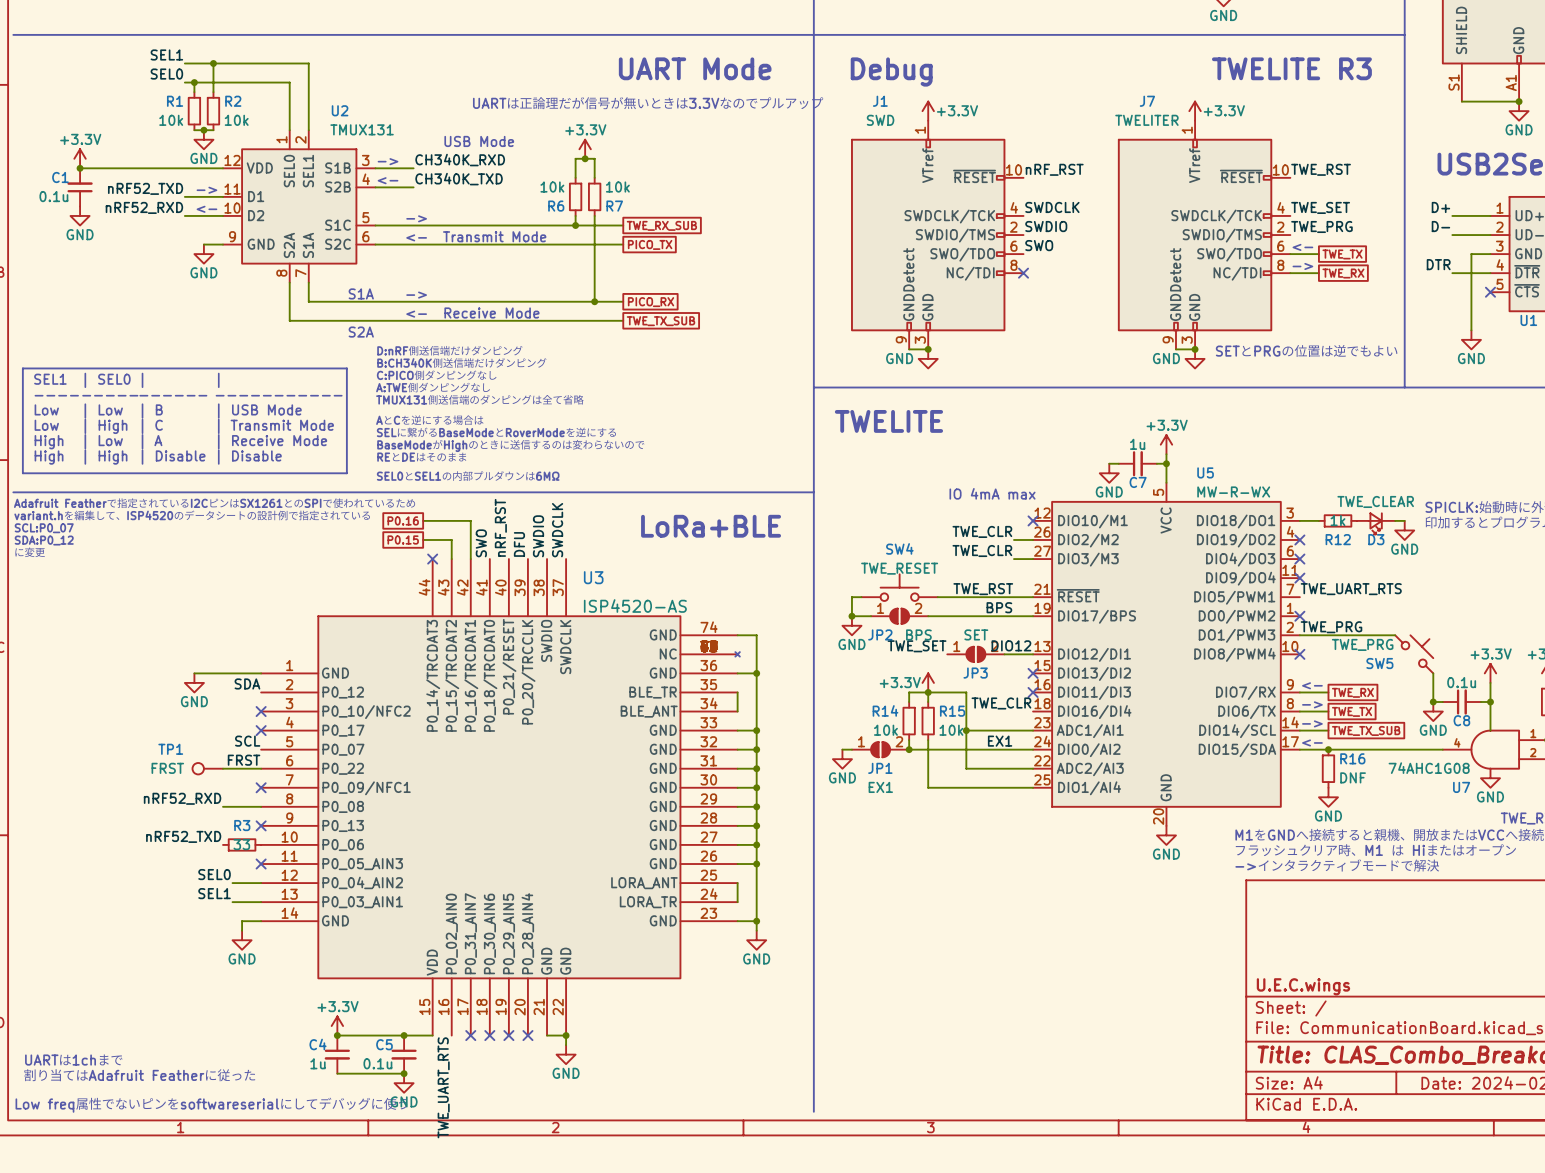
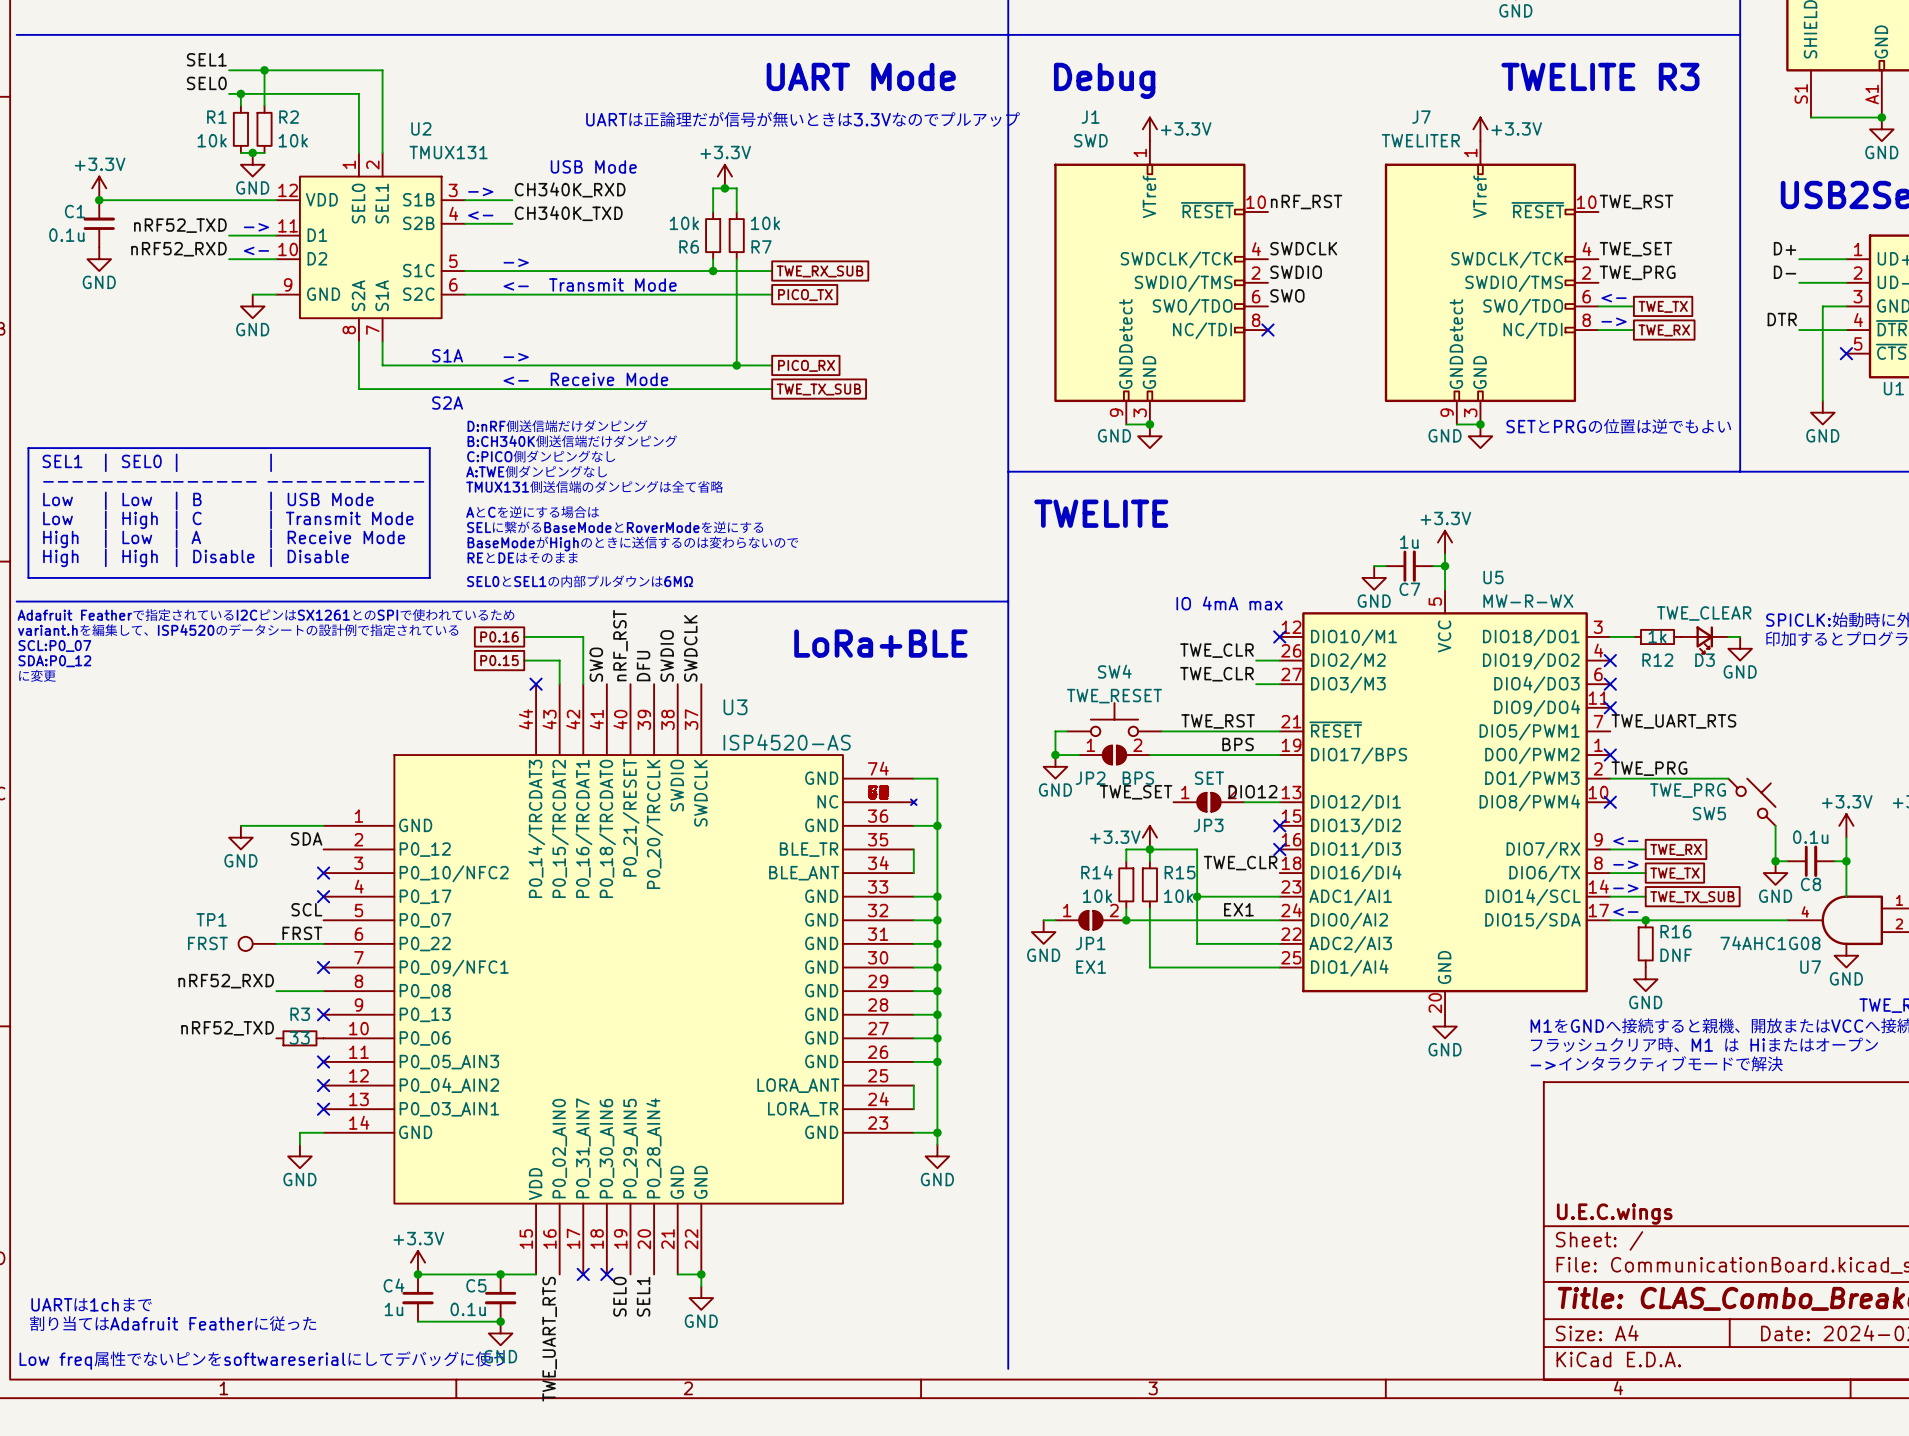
label: SEL0 (214, 874) -> none
wire: (232, 883) (261, 883) -> none
no-connect mark: none -> (323, 1085)
label: SEL1 (214, 893) -> none
wire: (232, 902) (261, 902) -> none
no-connect mark: none -> (323, 1109)
no-connect mark: (508, 1035) -> none
no-connect mark: (527, 1035) -> none
label: none -> SEL0 (619, 1296)
label: none -> SEL1 (643, 1296)

